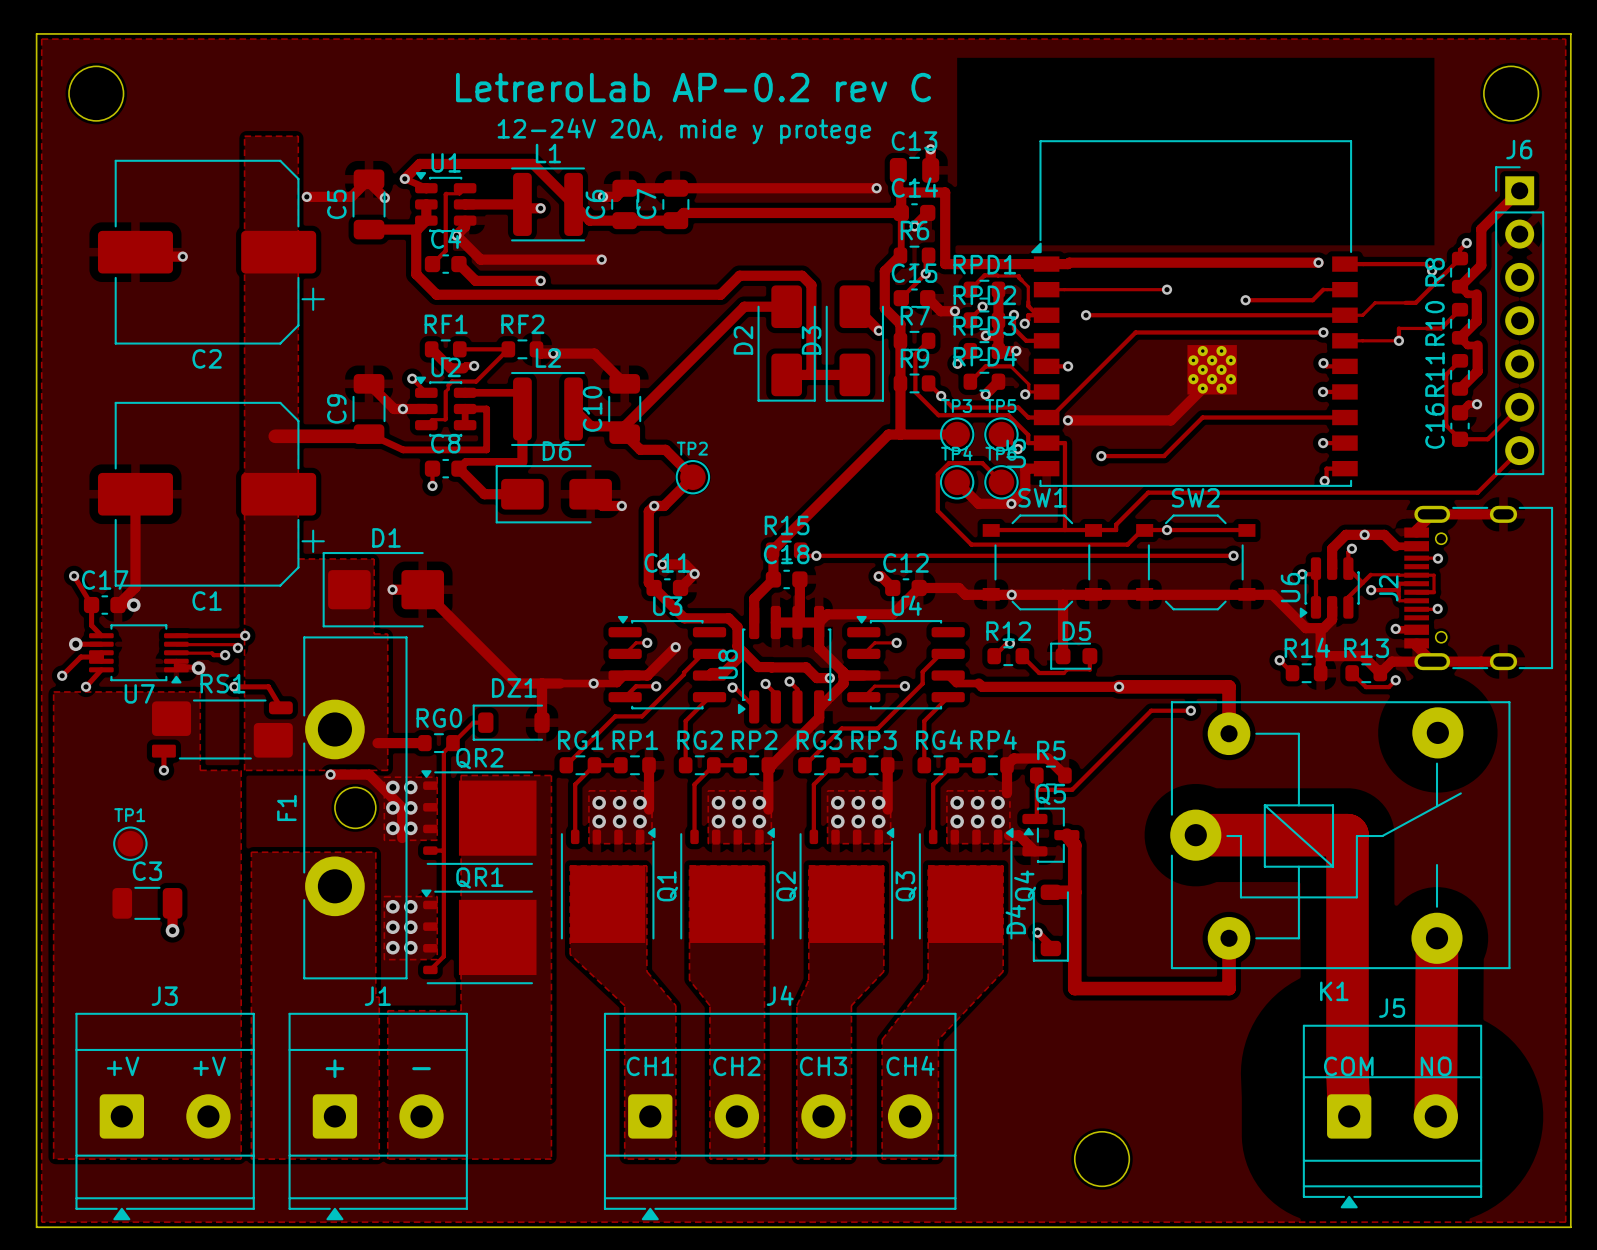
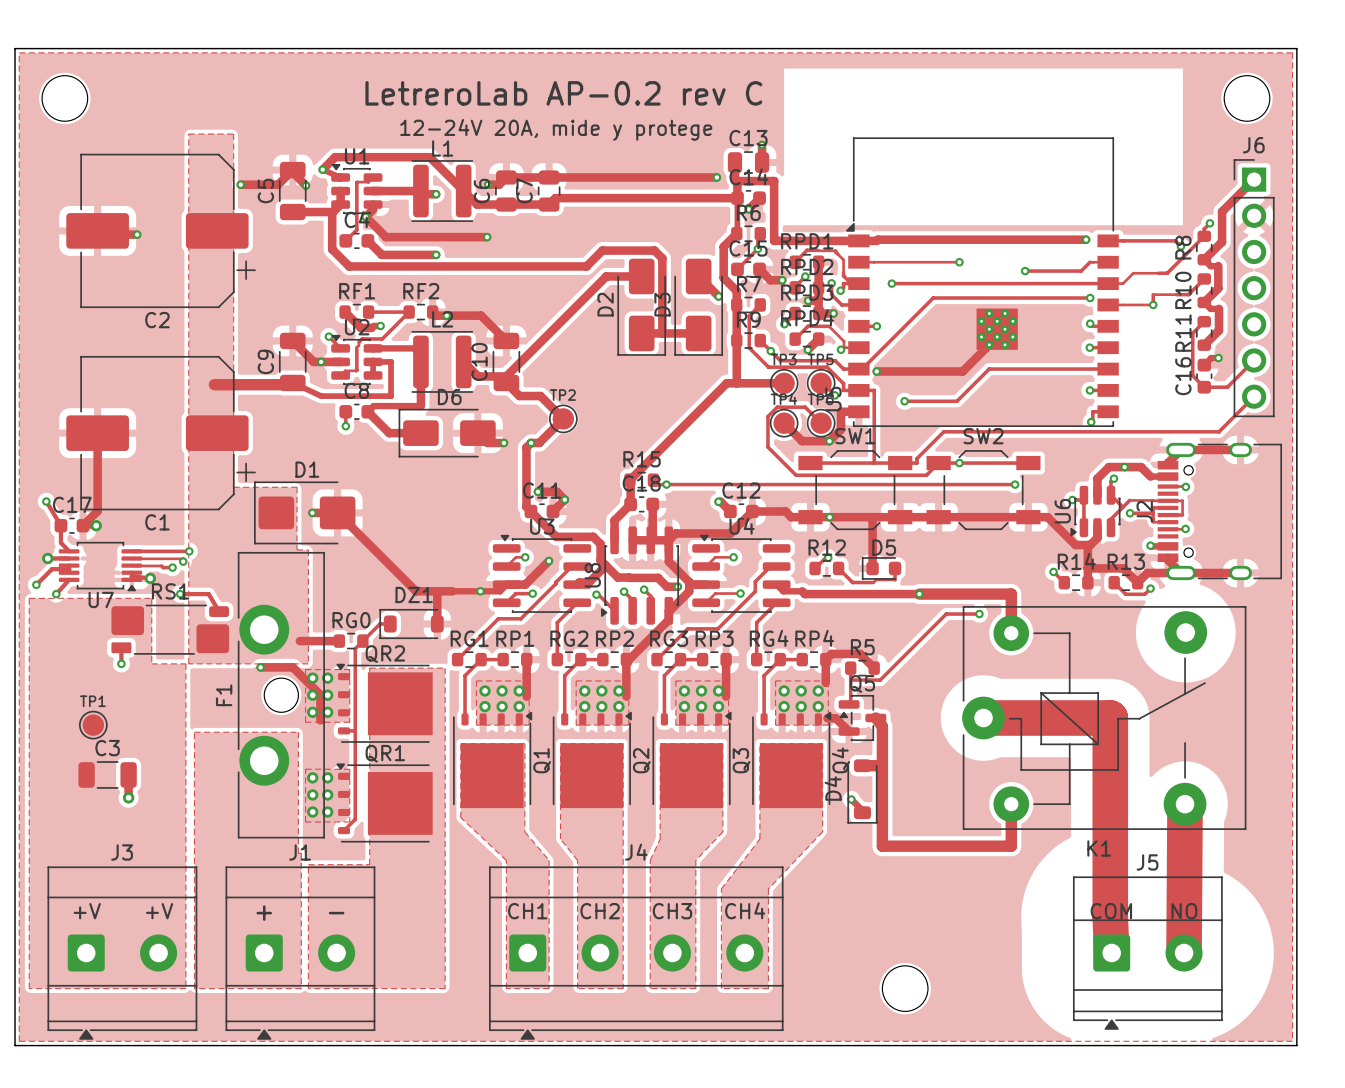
SW1 footprint: [982, 514, 1103, 611] -> [798, 450, 913, 531]
SW2 footprint: [1136, 514, 1256, 611] -> [926, 450, 1041, 531]

